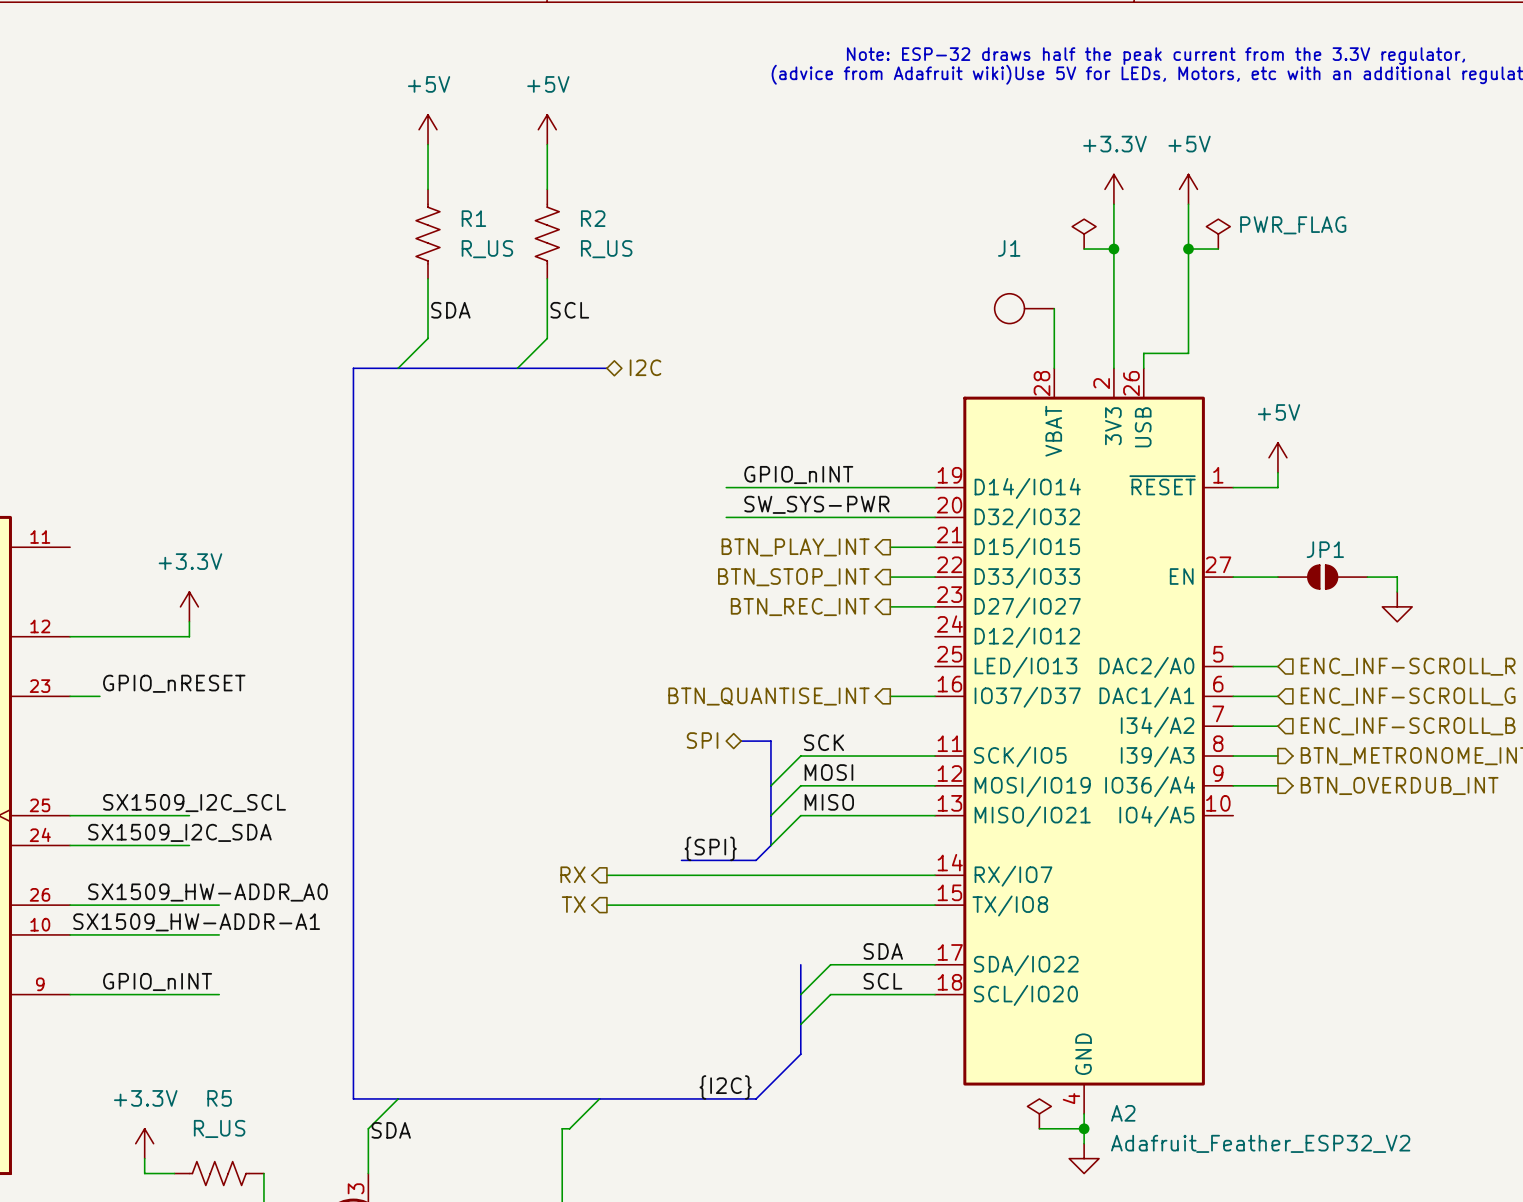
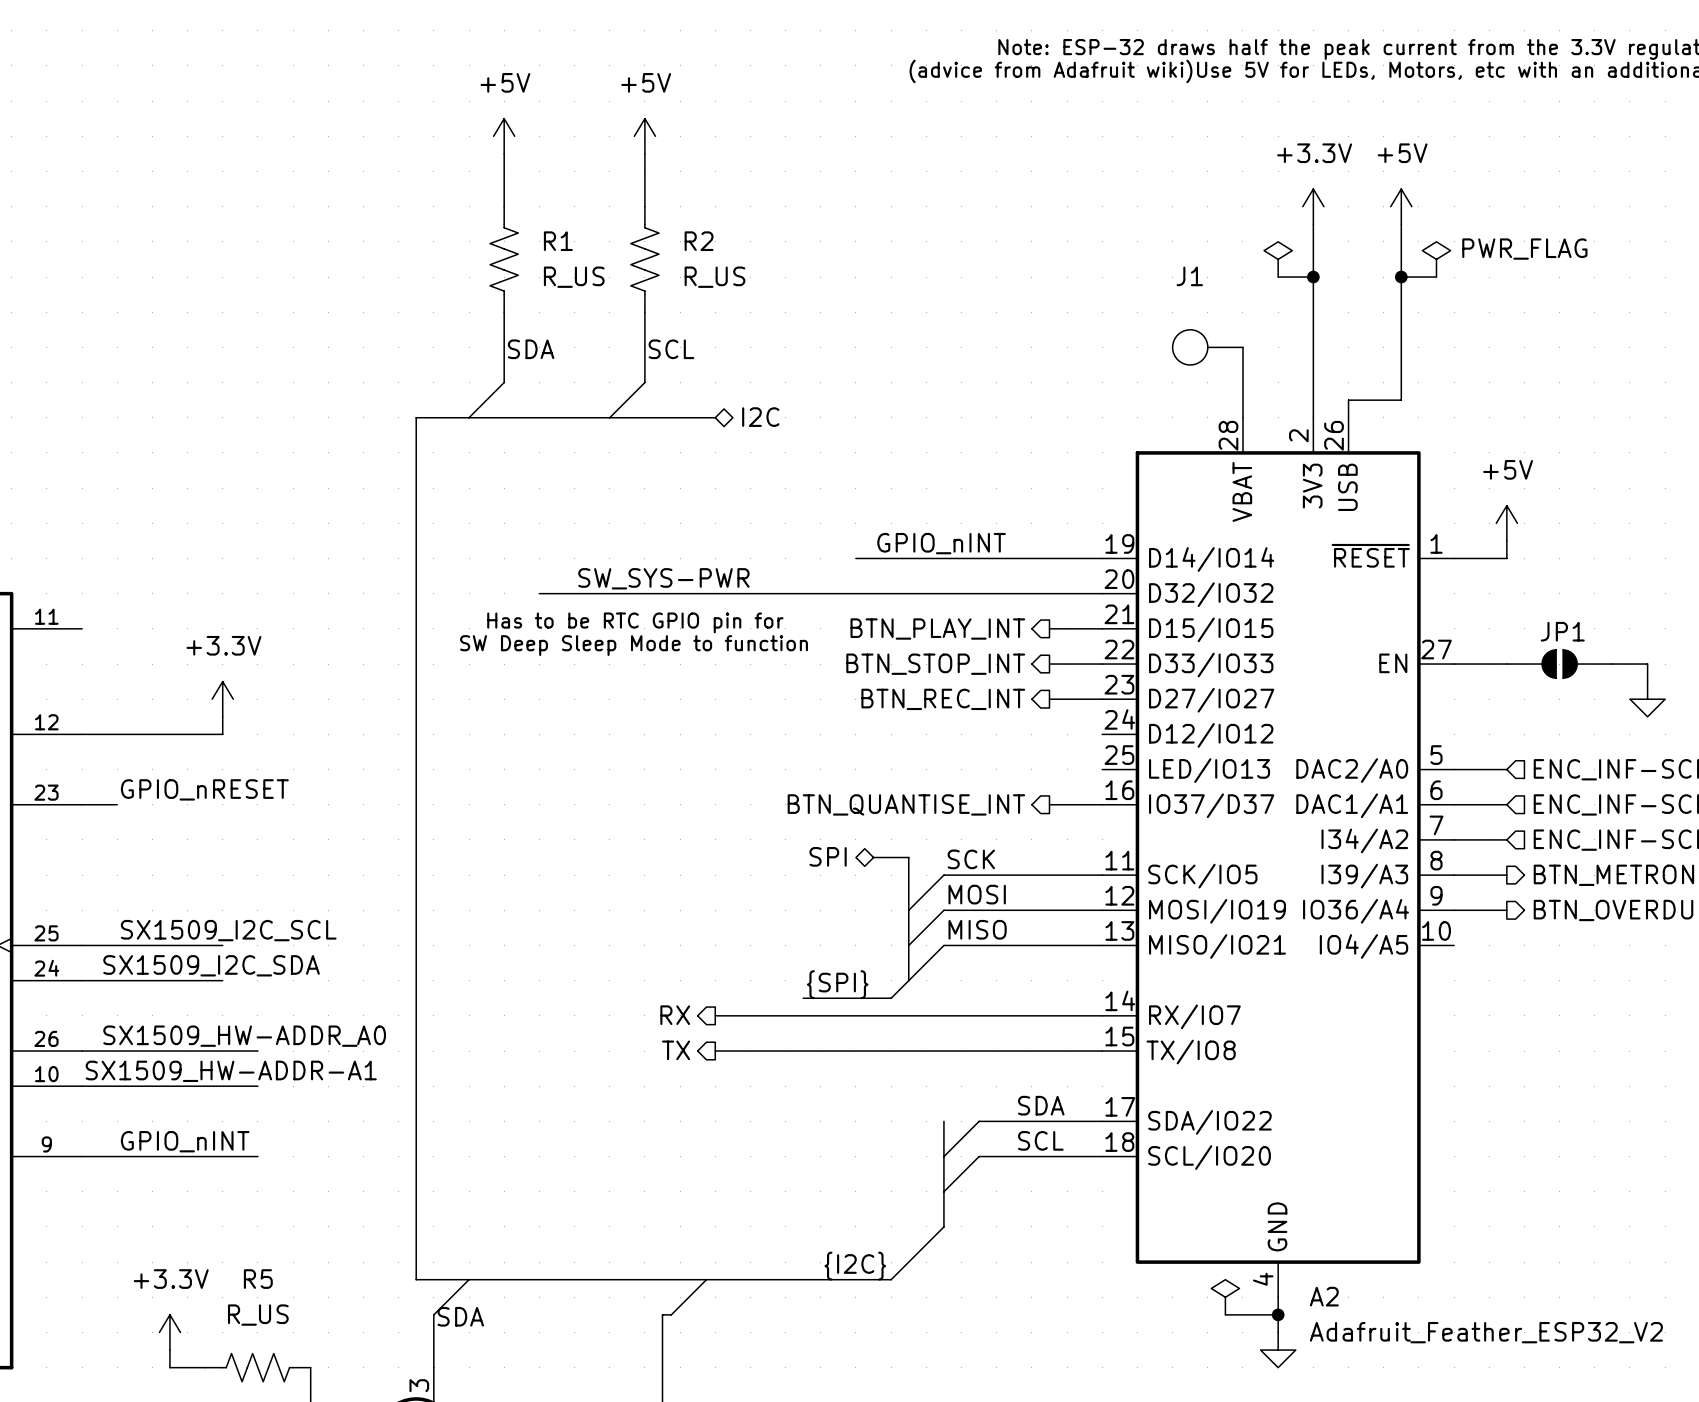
label position: SW_SYS-PWR (816, 504) -> SW_SYS-PWR (663, 578)
wire: none -> (539, 593) (855, 593)
text: none -> Has to be RTC GPIO pin for (635, 622)
text: none -> SW Deep Sleep Mode to function (634, 645)

